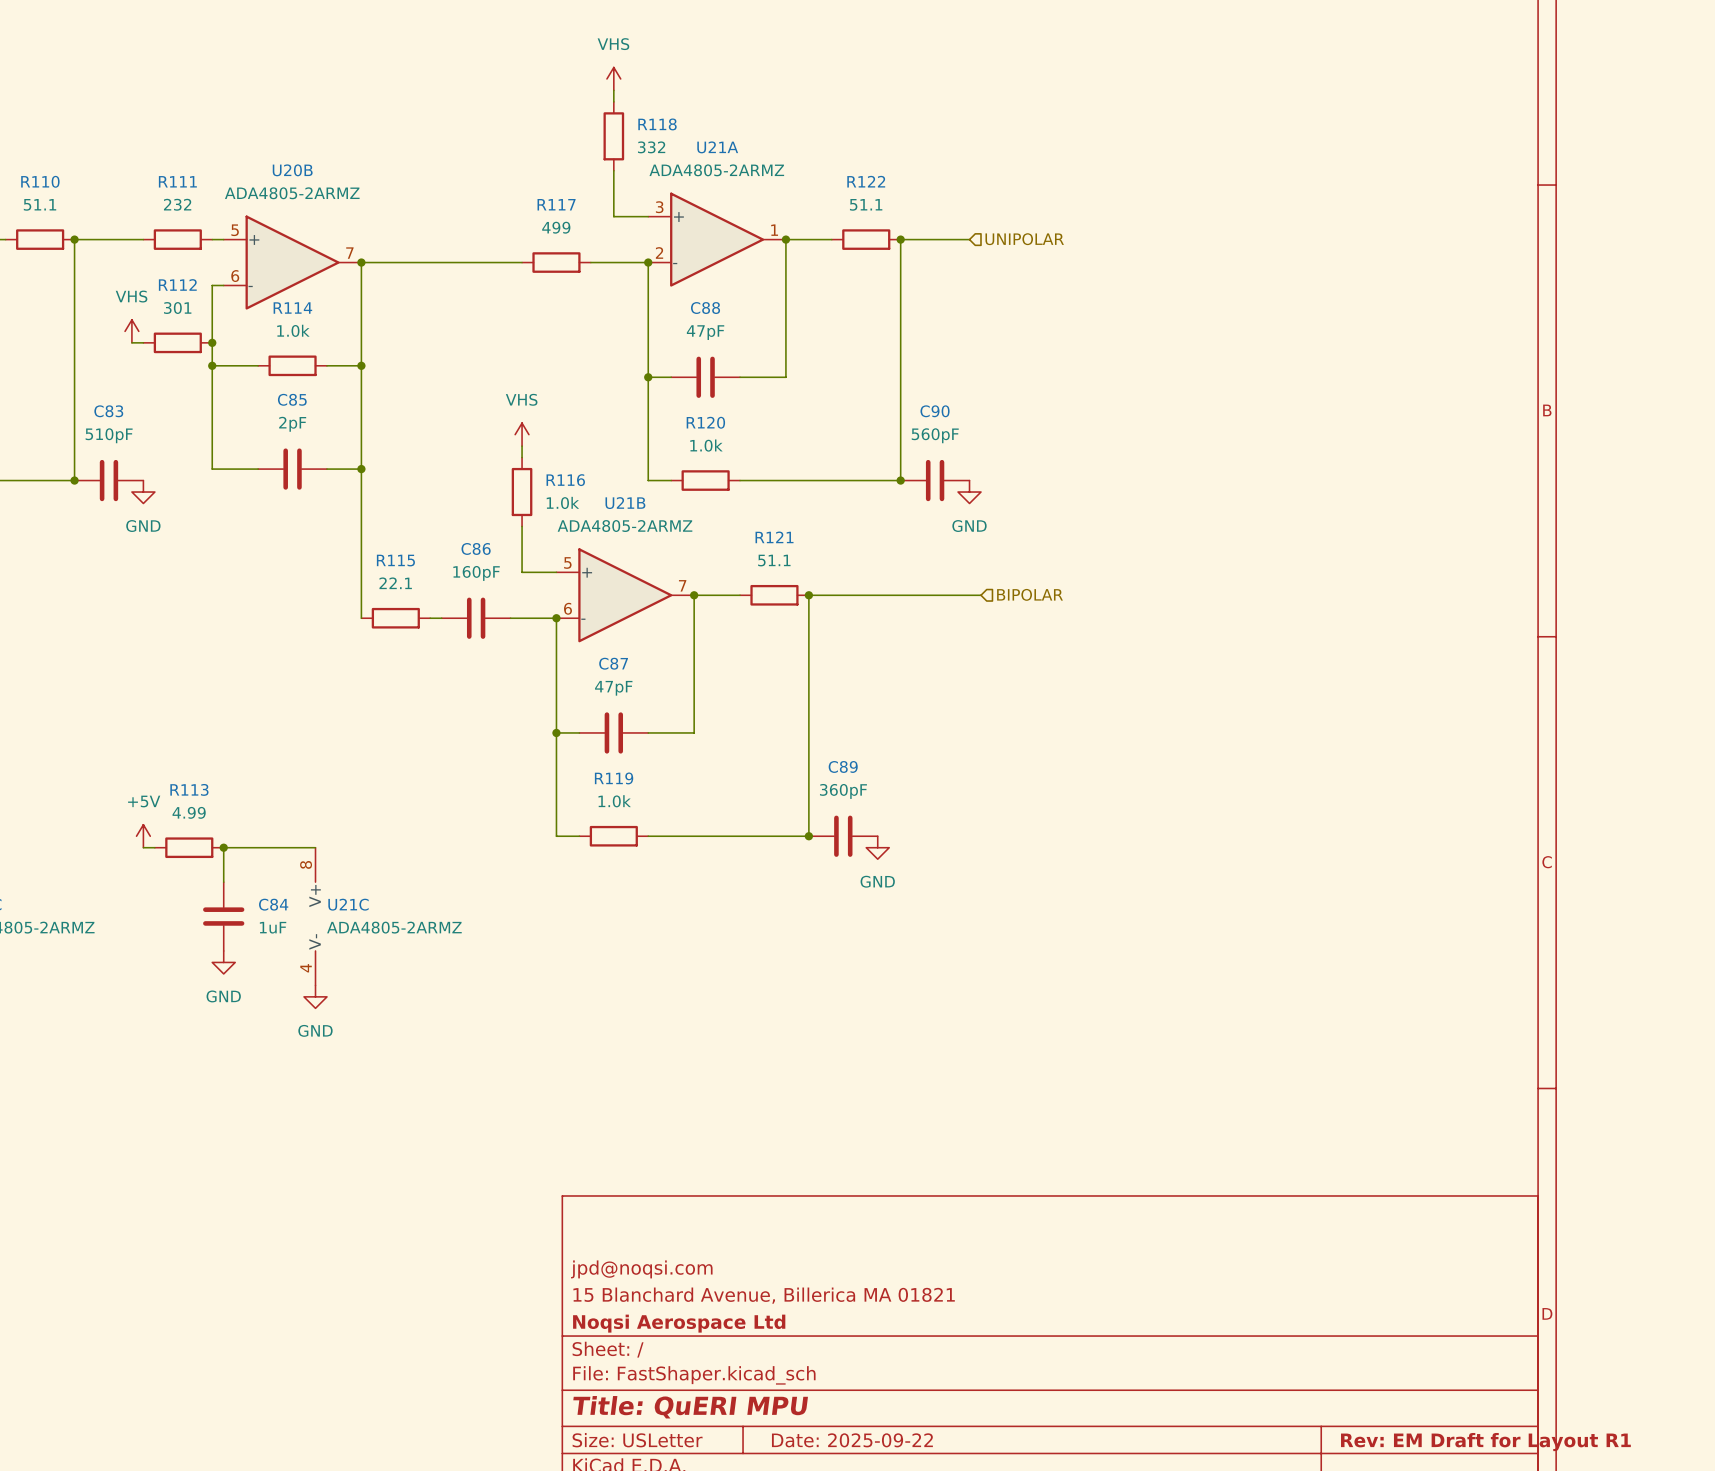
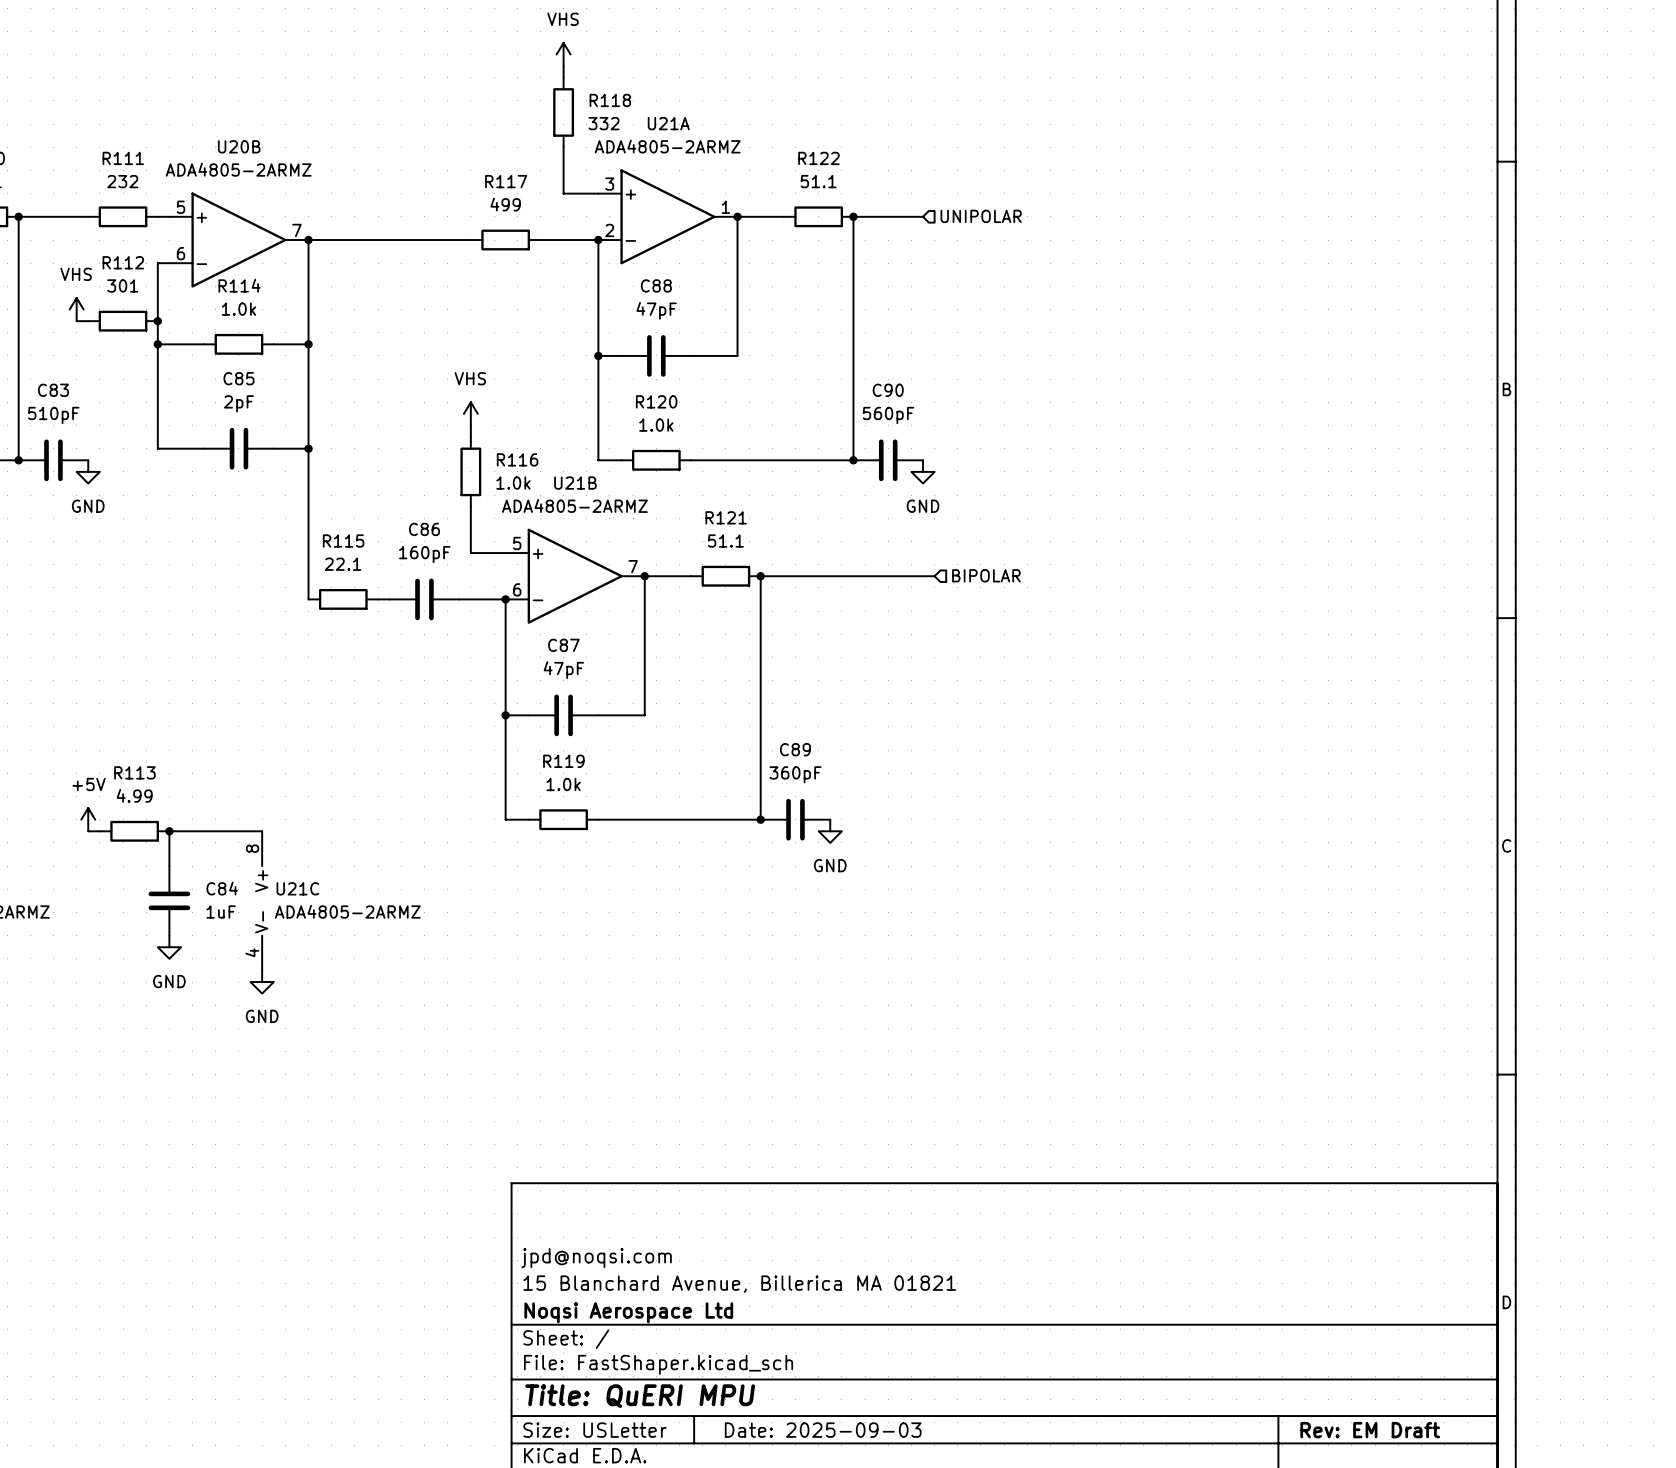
title block: Date: 2025-09-22 (852, 1440) -> Date: 2025-09-03 (823, 1430)
title block: Rev: EM Draft for Layout R1 (1485, 1442) -> Rev: EM Draft (1370, 1430)

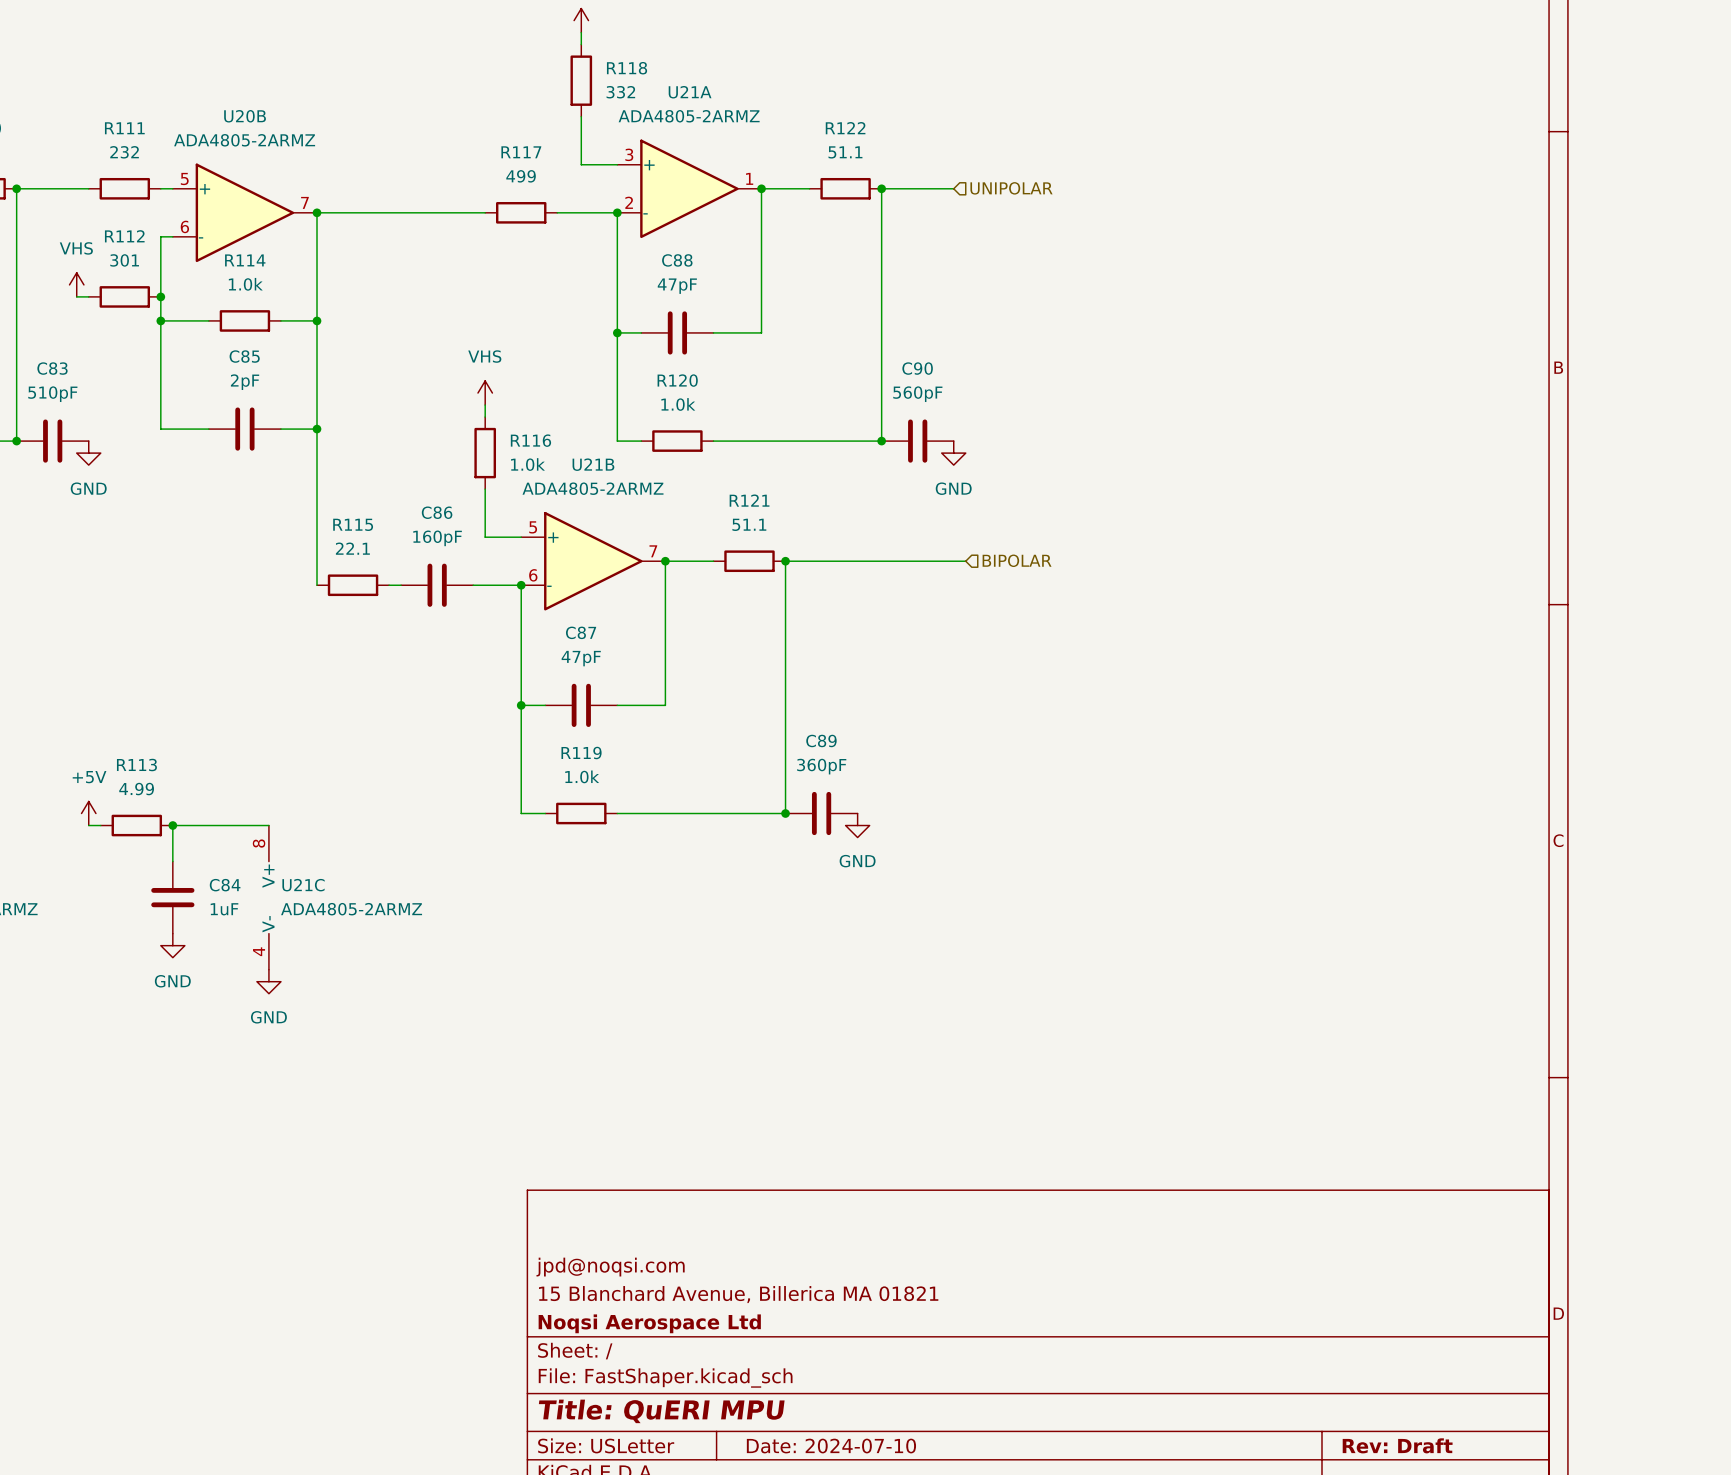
title block: Date: 2025-09-03 (823, 1430) -> Date: 2024-07-10 (831, 1446)
title block: Rev: EM Draft (1370, 1430) -> Rev: Draft (1397, 1445)

